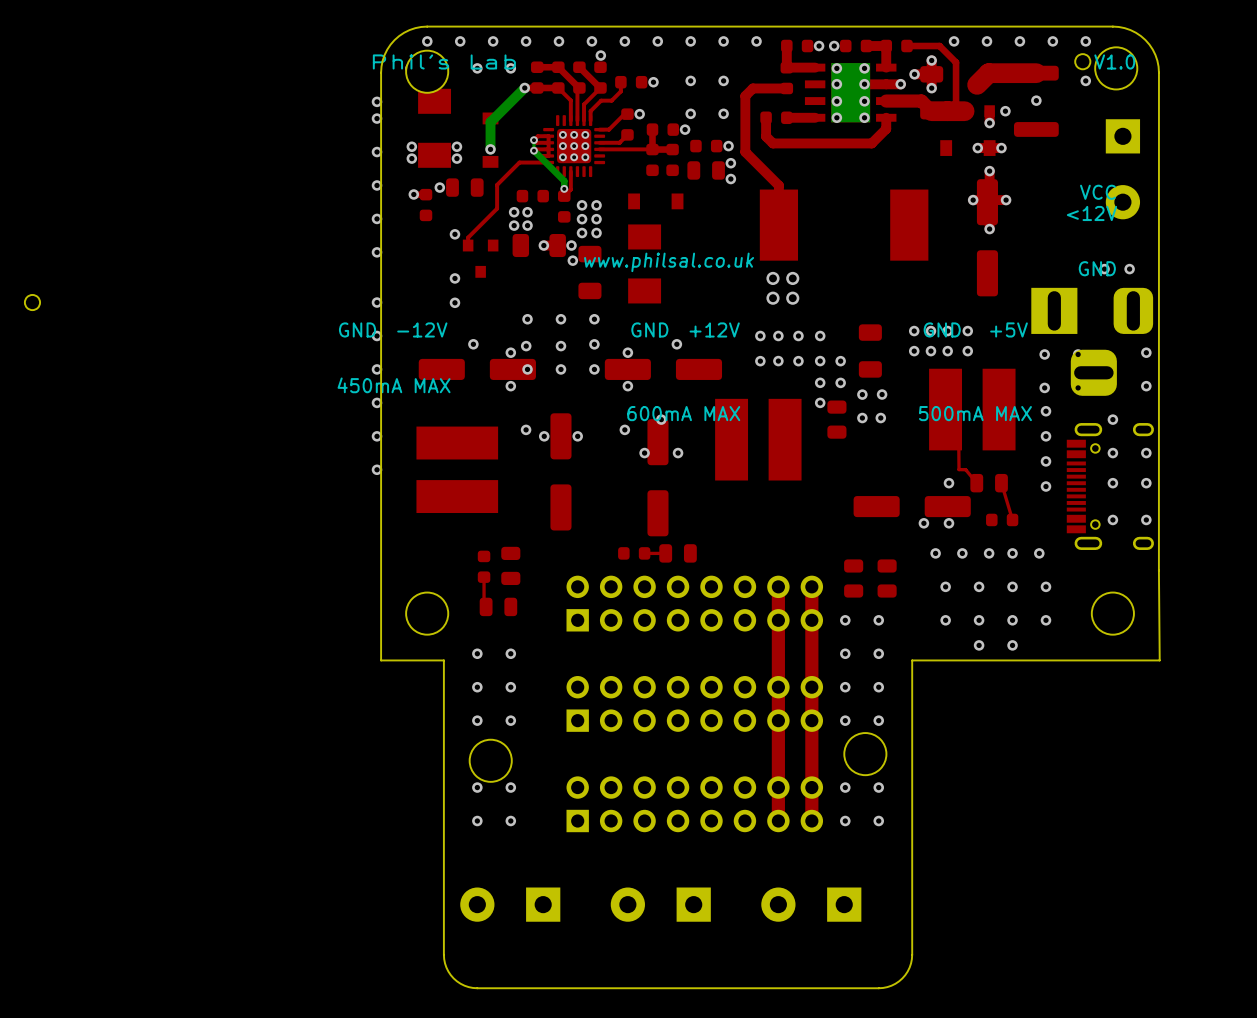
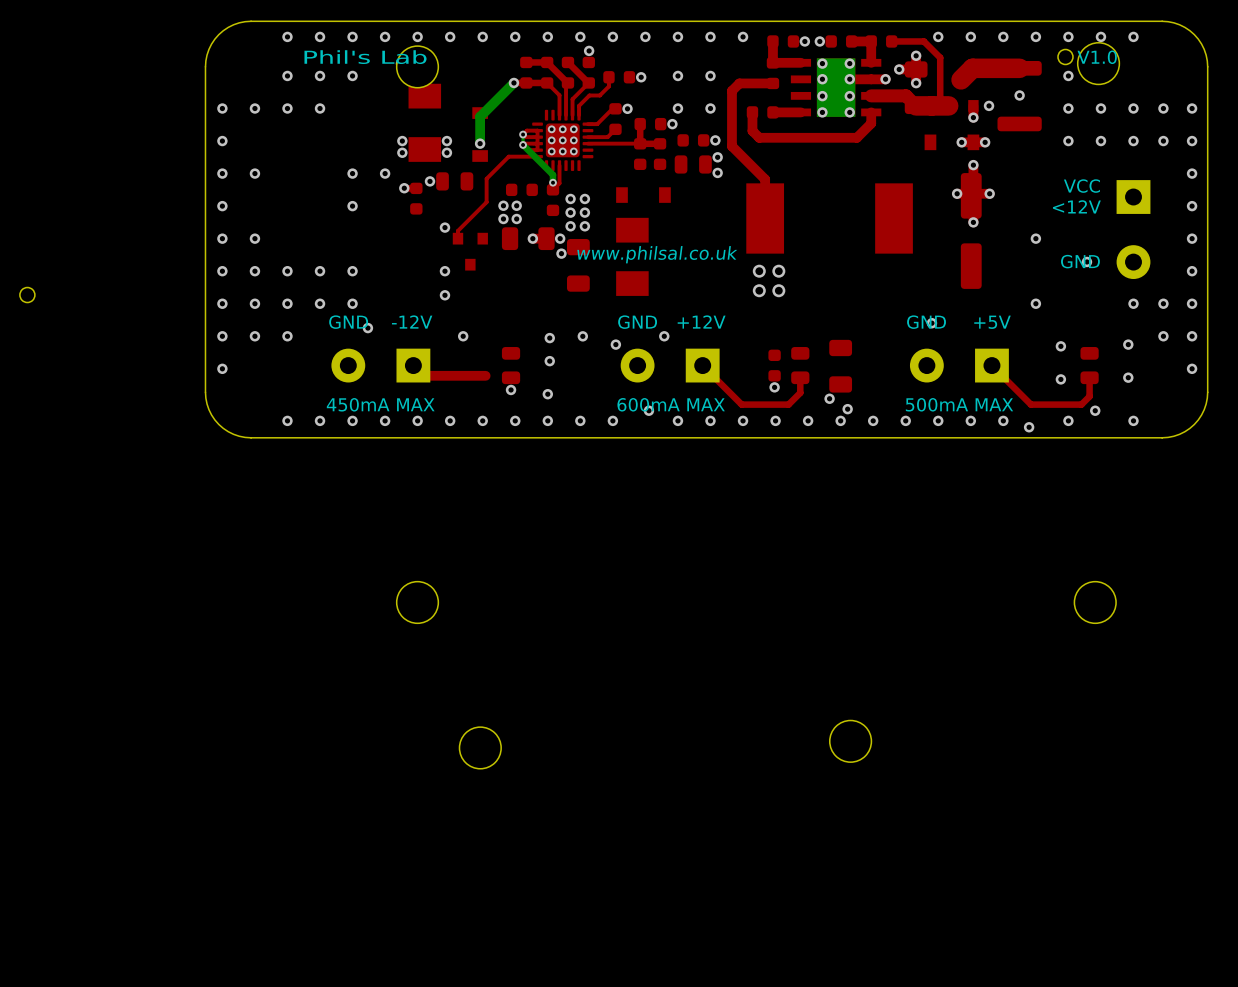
board edge: none -> (1162, 21) (251, 21) (233, 24) (218, 34) (211, 44) (207, 55) (205, 66) (205, 392) (208, 409) (218, 424) (228, 431) (239, 436) (251, 437) (1162, 437) (1179, 434) (1189, 428) (1198, 419) (1204, 409) (1207, 398) (1207, 66) (1204, 49) (1194, 34) (1179, 24) (1162, 21)
via: none -> (287, 36)
via: none -> (320, 36)
via: none -> (352, 36)
via: none -> (385, 36)
via: none -> (1100, 36)
via: none -> (1133, 36)
text position: Phil's Lab (444, 61) -> Phil's Lab (365, 57)
via: (477, 68) -> none
via: (510, 68) -> none
via: none -> (287, 75)
via: none -> (320, 75)
via: none -> (352, 75)
via: (377, 101) -> none
via: none -> (222, 108)
via: none -> (254, 108)
via: none -> (287, 108)
via: none -> (320, 108)
via: none -> (1068, 108)
via: none -> (1100, 108)
via: none -> (1133, 108)
via: none -> (1163, 108)
via: none -> (1192, 108)
via: (377, 118) -> none
via: none -> (222, 141)
via: none -> (1068, 141)
via: none -> (1100, 141)
via: none -> (1133, 141)
via: none -> (1163, 141)
via: none -> (1192, 141)
via: (377, 152) -> none
part position: (1122, 169) -> (1133, 229)
via: none -> (222, 173)
via: none -> (254, 173)
via: none -> (352, 173)
via: none -> (385, 173)
via: none -> (1192, 173)
via: (377, 185) -> none
via: none -> (222, 206)
via: none -> (352, 206)
via: none -> (1192, 206)
via: (377, 218) -> none
via: none -> (222, 238)
via: none -> (254, 238)
via: none -> (1035, 238)
via: none -> (1192, 238)
via: (377, 252) -> none
via: (1129, 269) -> none
via: none -> (222, 271)
via: none -> (254, 271)
via: none -> (287, 271)
via: none -> (320, 271)
via: none -> (352, 271)
via: none -> (1192, 271)
via: (377, 302) -> none
via: none -> (222, 303)
via: none -> (254, 303)
via: none -> (287, 303)
via: none -> (320, 303)
via: none -> (352, 303)
via: none -> (1133, 303)
via: none -> (1163, 303)
via: none -> (1192, 303)
via: (527, 319) -> none
via: (560, 319) -> none
via: (594, 319) -> none
via: (914, 331) -> none
via: (930, 331) -> none
via: (967, 331) -> none
via: (760, 335) -> none
via: (778, 335) -> none
via: (798, 335) -> none
via: (820, 335) -> none
part: (1092, 341) -> none
via: none -> (222, 336)
via: none -> (254, 336)
via: none -> (287, 336)
via: none -> (1163, 336)
via: none -> (1192, 336)
via: (526, 346) -> none
part position: (870, 351) -> (840, 366)
via: (914, 351) -> none
via: (930, 351) -> none
via: (947, 351) -> none
via: (967, 351) -> none
via: (510, 352) -> none
via: (1044, 354) -> none
via: (760, 361) -> none
via: (778, 361) -> none
via: (798, 361) -> none
via: (820, 361) -> none
via: (840, 361) -> none
via: (377, 369) -> none
part: (477, 369) -> none
via: (527, 369) -> none
via: (594, 369) -> none
part: (663, 369) -> none
part: none -> (380, 365)
top track: none -> (413, 365) (423, 375) (485, 375)
part: none -> (511, 365)
part: none -> (670, 365)
top track: none -> (702, 365) (741, 404) (788, 404) (800, 392) (800, 377)
part: none -> (774, 365)
part: none -> (800, 365)
part: none -> (959, 365)
top track: none -> (991, 365) (1031, 404) (1081, 404) (1089, 396) (1089, 377)
part: none -> (1089, 365)
via: none -> (222, 368)
via: none -> (1192, 368)
via: (820, 382) -> none
via: (840, 382) -> none
text position: 450mA MAX (394, 385) -> 450mA MAX (380, 404)
via: (510, 386) -> none
via: (627, 386) -> none
via: (1044, 387) -> none
via: (862, 394) -> none
via: (882, 394) -> none
via: none -> (774, 387)
via: none -> (511, 389)
via: (377, 402) -> none
via: none -> (547, 394)
via: (820, 402) -> none
via: none -> (829, 398)
top track: (958, 409) (959, 469) (965, 469) (976, 483) -> none
part: (972, 409) -> none
via: (1045, 411) -> none
via: (880, 418) -> none
part: (836, 419) -> none
via: none -> (287, 420)
via: none -> (320, 420)
via: none -> (352, 420)
via: none -> (385, 420)
via: none -> (417, 420)
via: none -> (450, 420)
via: none -> (482, 420)
via: none -> (547, 420)
via: none -> (580, 420)
via: none -> (677, 420)
via: none -> (710, 420)
via: none -> (743, 420)
via: none -> (775, 420)
via: none -> (808, 420)
via: none -> (840, 420)
via: none -> (873, 420)
via: none -> (905, 420)
via: none -> (938, 420)
via: none -> (970, 420)
via: none -> (1003, 420)
via: none -> (1068, 420)
via: none -> (1133, 420)
via: (377, 436) -> none
via: (544, 436) -> none
via: (577, 436) -> none
part: (758, 439) -> none
via: (644, 453) -> none
via: (678, 453) -> none
via: (1112, 453) -> none
via: (1146, 453) -> none
via: (1045, 461) -> none
via: (377, 469) -> none
part: (457, 469) -> none
part: (560, 471) -> none
part: (657, 477) -> none
via: (948, 483) -> none
part: (989, 483) -> none
top track: (1001, 483) (1012, 519) -> none
via: (1112, 483) -> none
via: (1146, 483) -> none
via: (1045, 486) -> none
part: (1110, 486) -> none
part: (912, 506) -> none
part: (1002, 519) -> none
via: (1112, 519) -> none
via: (1146, 519) -> none
via: (923, 523) -> none
via: (948, 523) -> none
part: (634, 553) -> none
top track: (665, 553) (644, 553) -> none
part: (678, 553) -> none
via: (935, 553) -> none
via: (962, 553) -> none
via: (989, 553) -> none
via: (1012, 553) -> none
via: (1039, 553) -> none
part: (510, 565) -> none
part: (484, 566) -> none
board edge: (1158, 570) (1159, 660) (912, 660) (912, 954) (907, 971) (895, 983) (878, 988) (477, 988) (468, 987) (456, 981) (448, 971) (443, 954) (443, 660) (381, 660) (381, 72) (382, 60) (390, 44) (399, 36) (409, 30) (427, 26) (1112, 26) (1130, 30) (1140, 36) (1149, 44) (1155, 55) (1158, 72) (1158, 571) -> none
top track: (484, 577) (484, 605) -> none
part: (853, 578) -> none
part: (887, 578) -> none
top track: (778, 586) (778, 821) -> none
top track: (811, 586) (811, 821) -> none
via: (945, 586) -> none
via: (979, 586) -> none
via: (1012, 586) -> none
via: (1045, 586) -> none
part: (694, 603) -> none
part: (498, 606) -> none
via: (845, 620) -> none
via: (878, 620) -> none
via: (945, 620) -> none
via: (979, 620) -> none
via: (1012, 620) -> none
via: (1045, 620) -> none
via: (979, 645) -> none
via: (1012, 645) -> none
via: (477, 653) -> none
via: (510, 653) -> none
via: (845, 653) -> none
via: (878, 653) -> none
via: (477, 687) -> none
via: (510, 687) -> none
via: (845, 687) -> none
via: (878, 687) -> none
part: (694, 703) -> none
via: (477, 720) -> none
via: (510, 720) -> none
via: (845, 720) -> none
via: (878, 720) -> none
via: (477, 787) -> none
via: (510, 787) -> none
via: (845, 787) -> none
via: (878, 787) -> none
part: (694, 804) -> none
via: (477, 821) -> none
via: (510, 821) -> none
via: (845, 821) -> none
via: (878, 821) -> none
part: (510, 904) -> none
part: (660, 904) -> none
part: (811, 904) -> none

